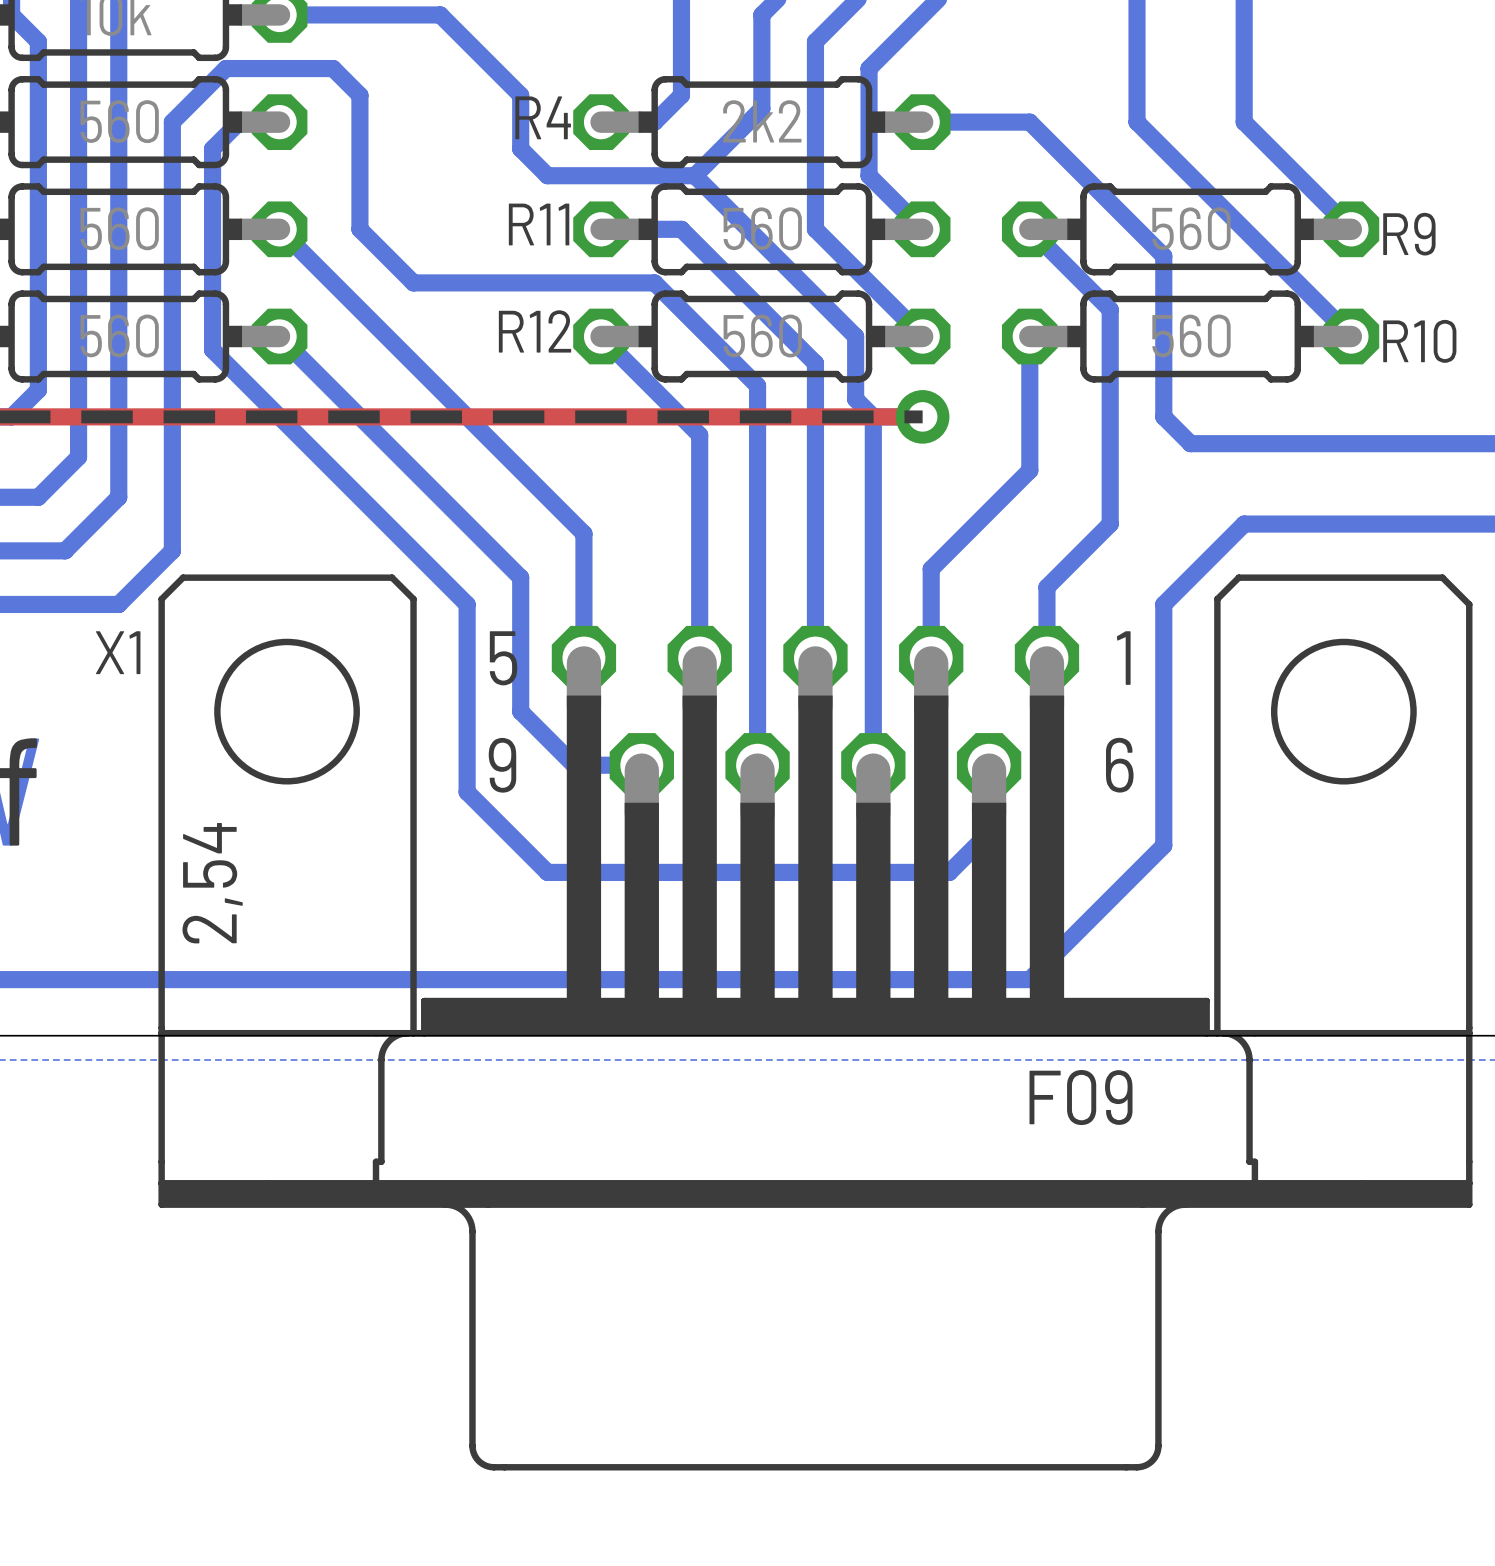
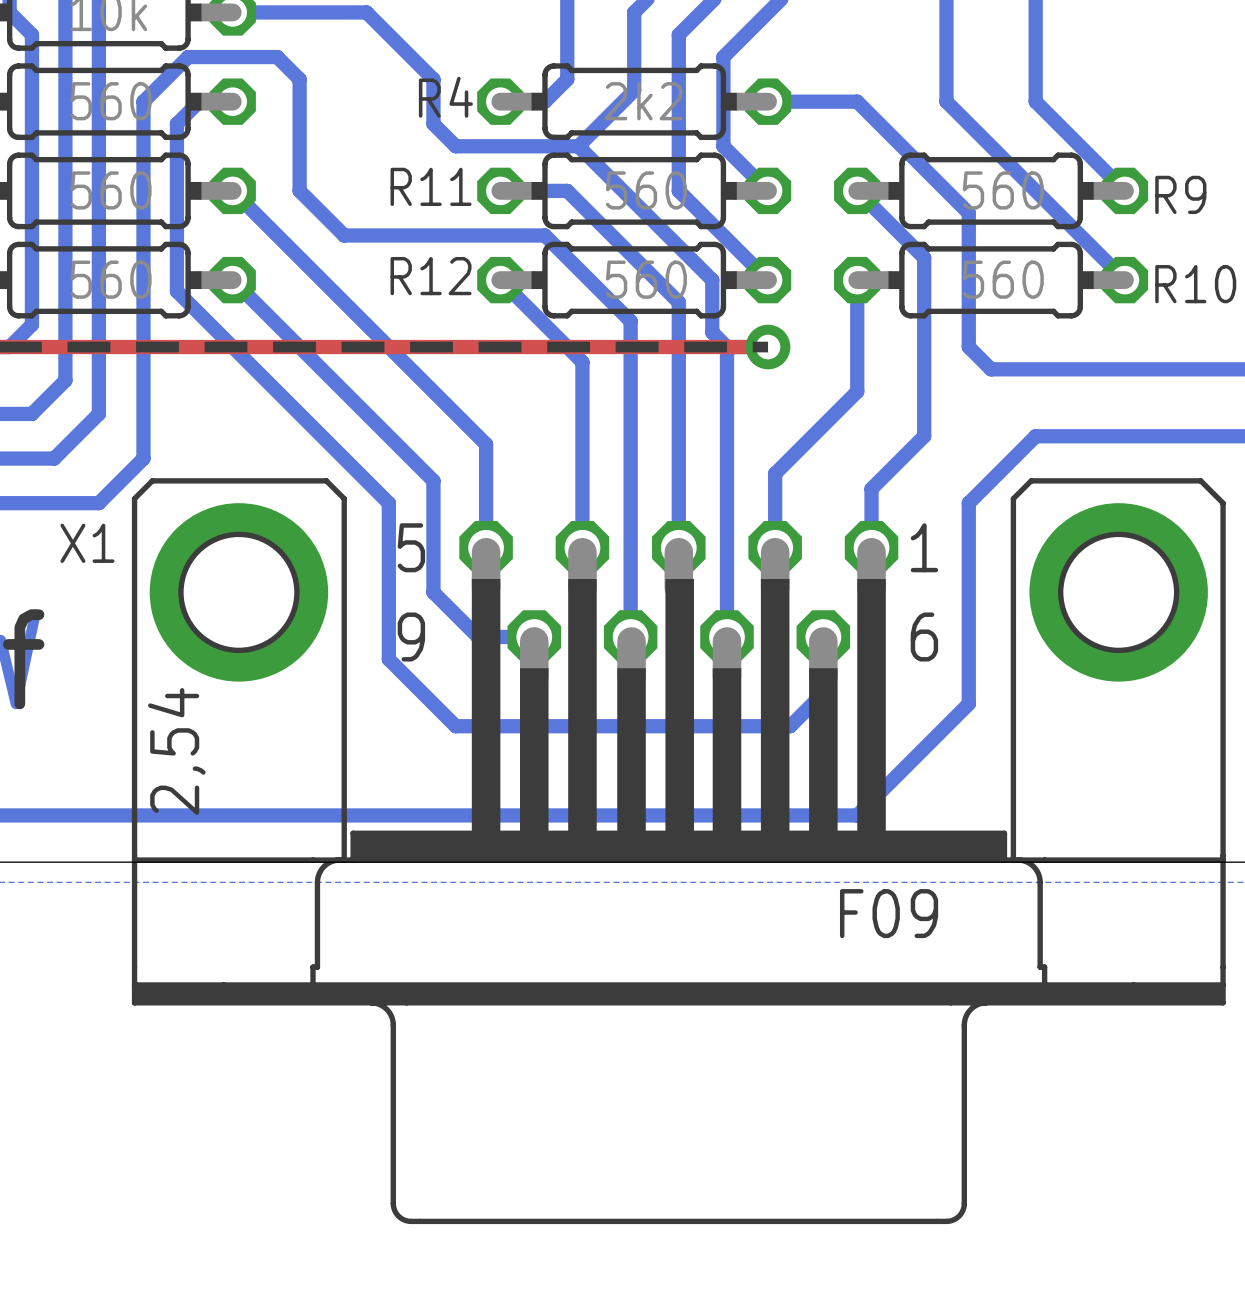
X1 footprint: [158, 574, 1473, 1471] -> [131, 478, 1226, 1225]

